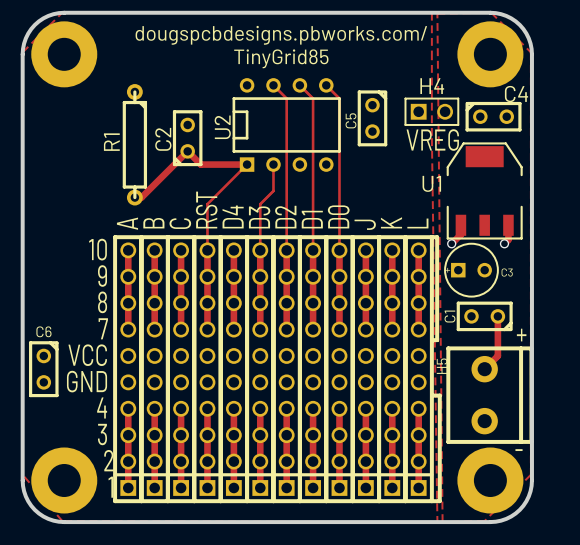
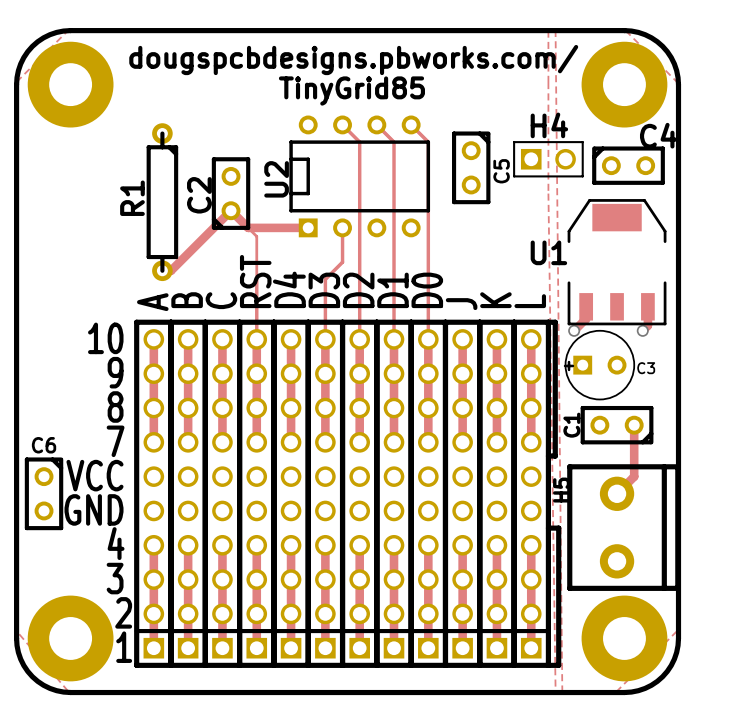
C5 name position: C5 (350, 120) -> C5 (501, 171)
text: VREG (432, 140) -> none
track: (247, 164) (207, 204) -> (248, 227) (256, 236) (256, 279)
text: + (521, 335) -> none
text: - (519, 450) -> none

